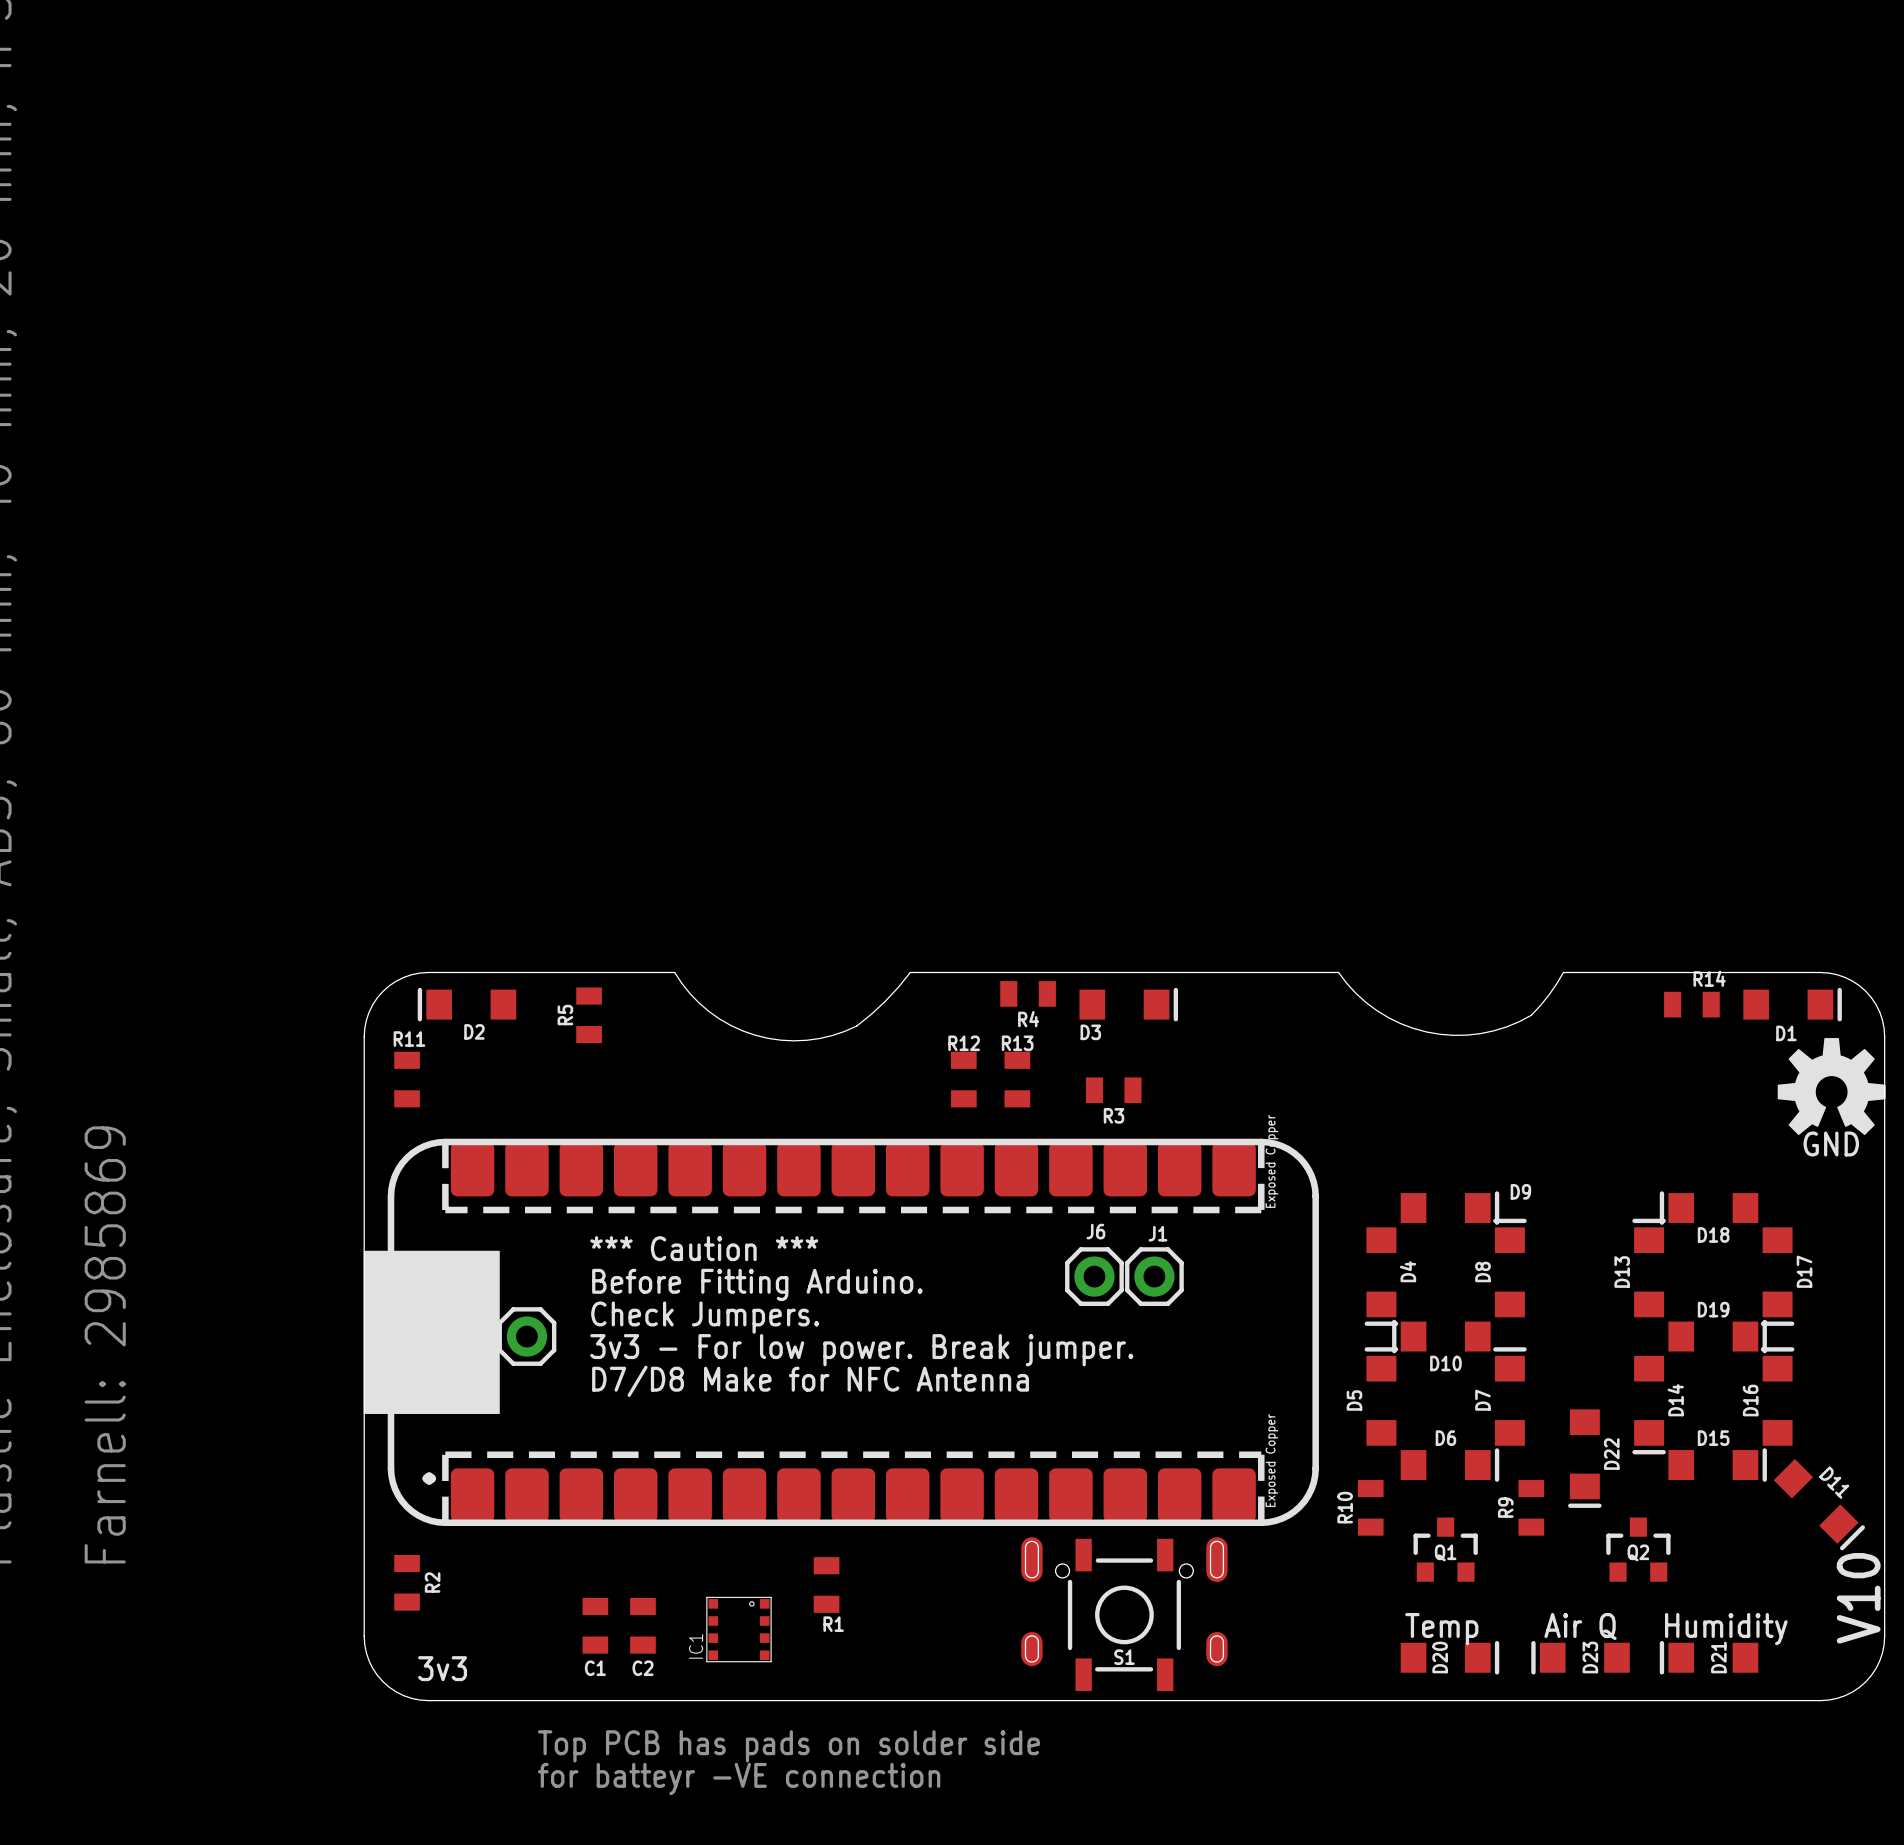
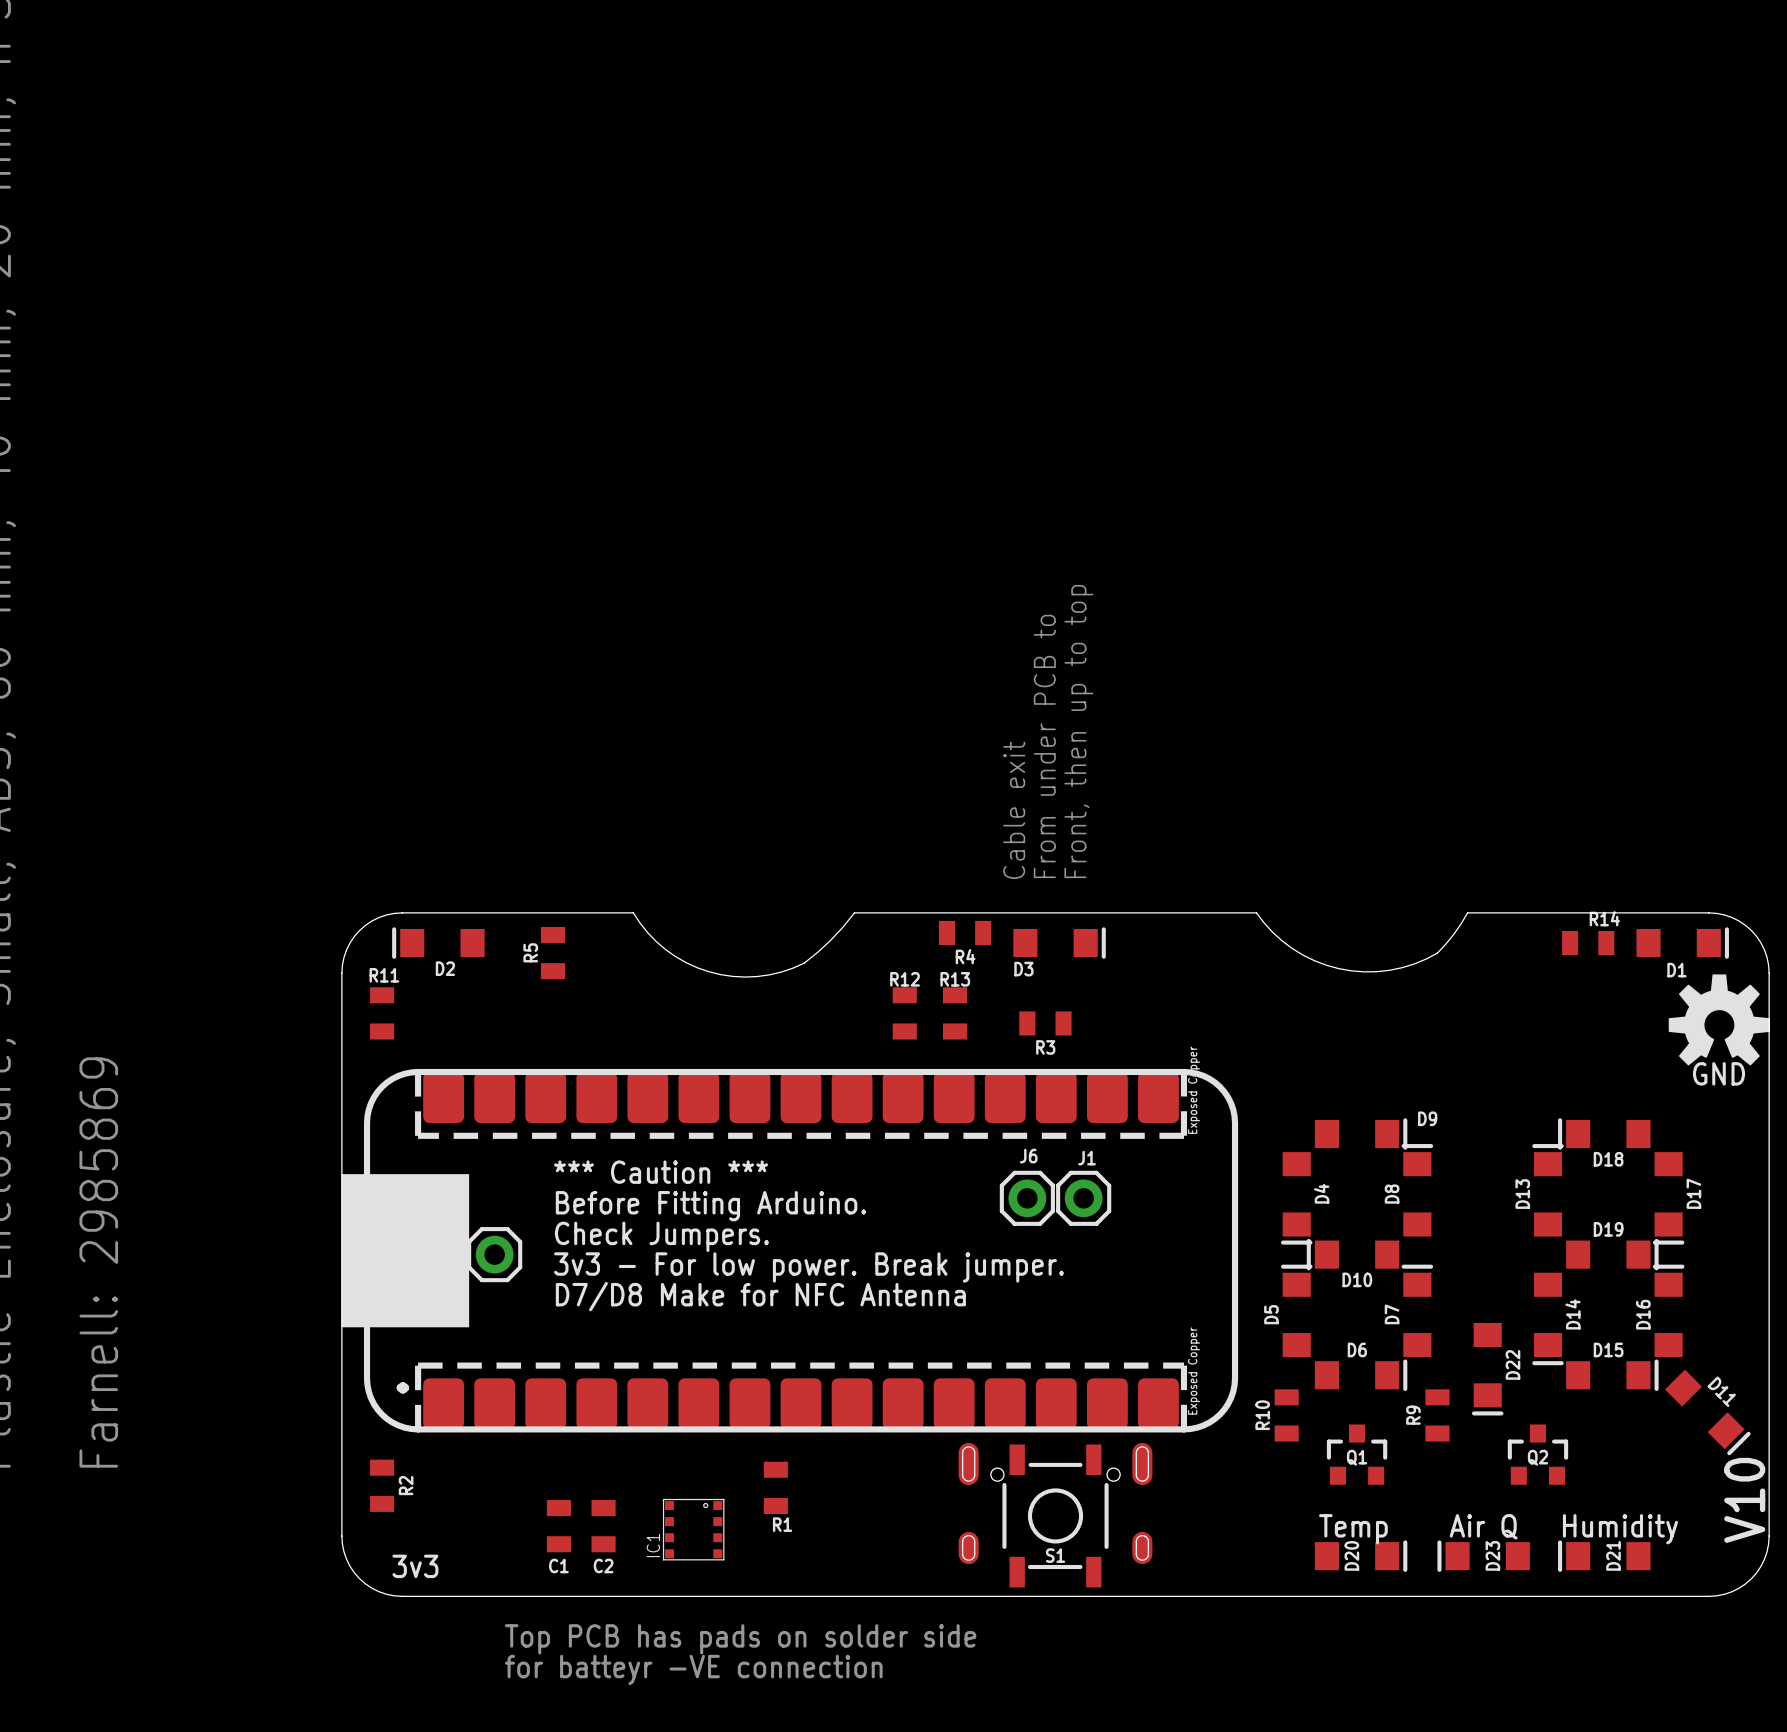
text: none -> Front, then up to top (1078, 731)
text: none -> From under PCB to (1044, 746)
text: none -> Cable exit (1014, 810)

